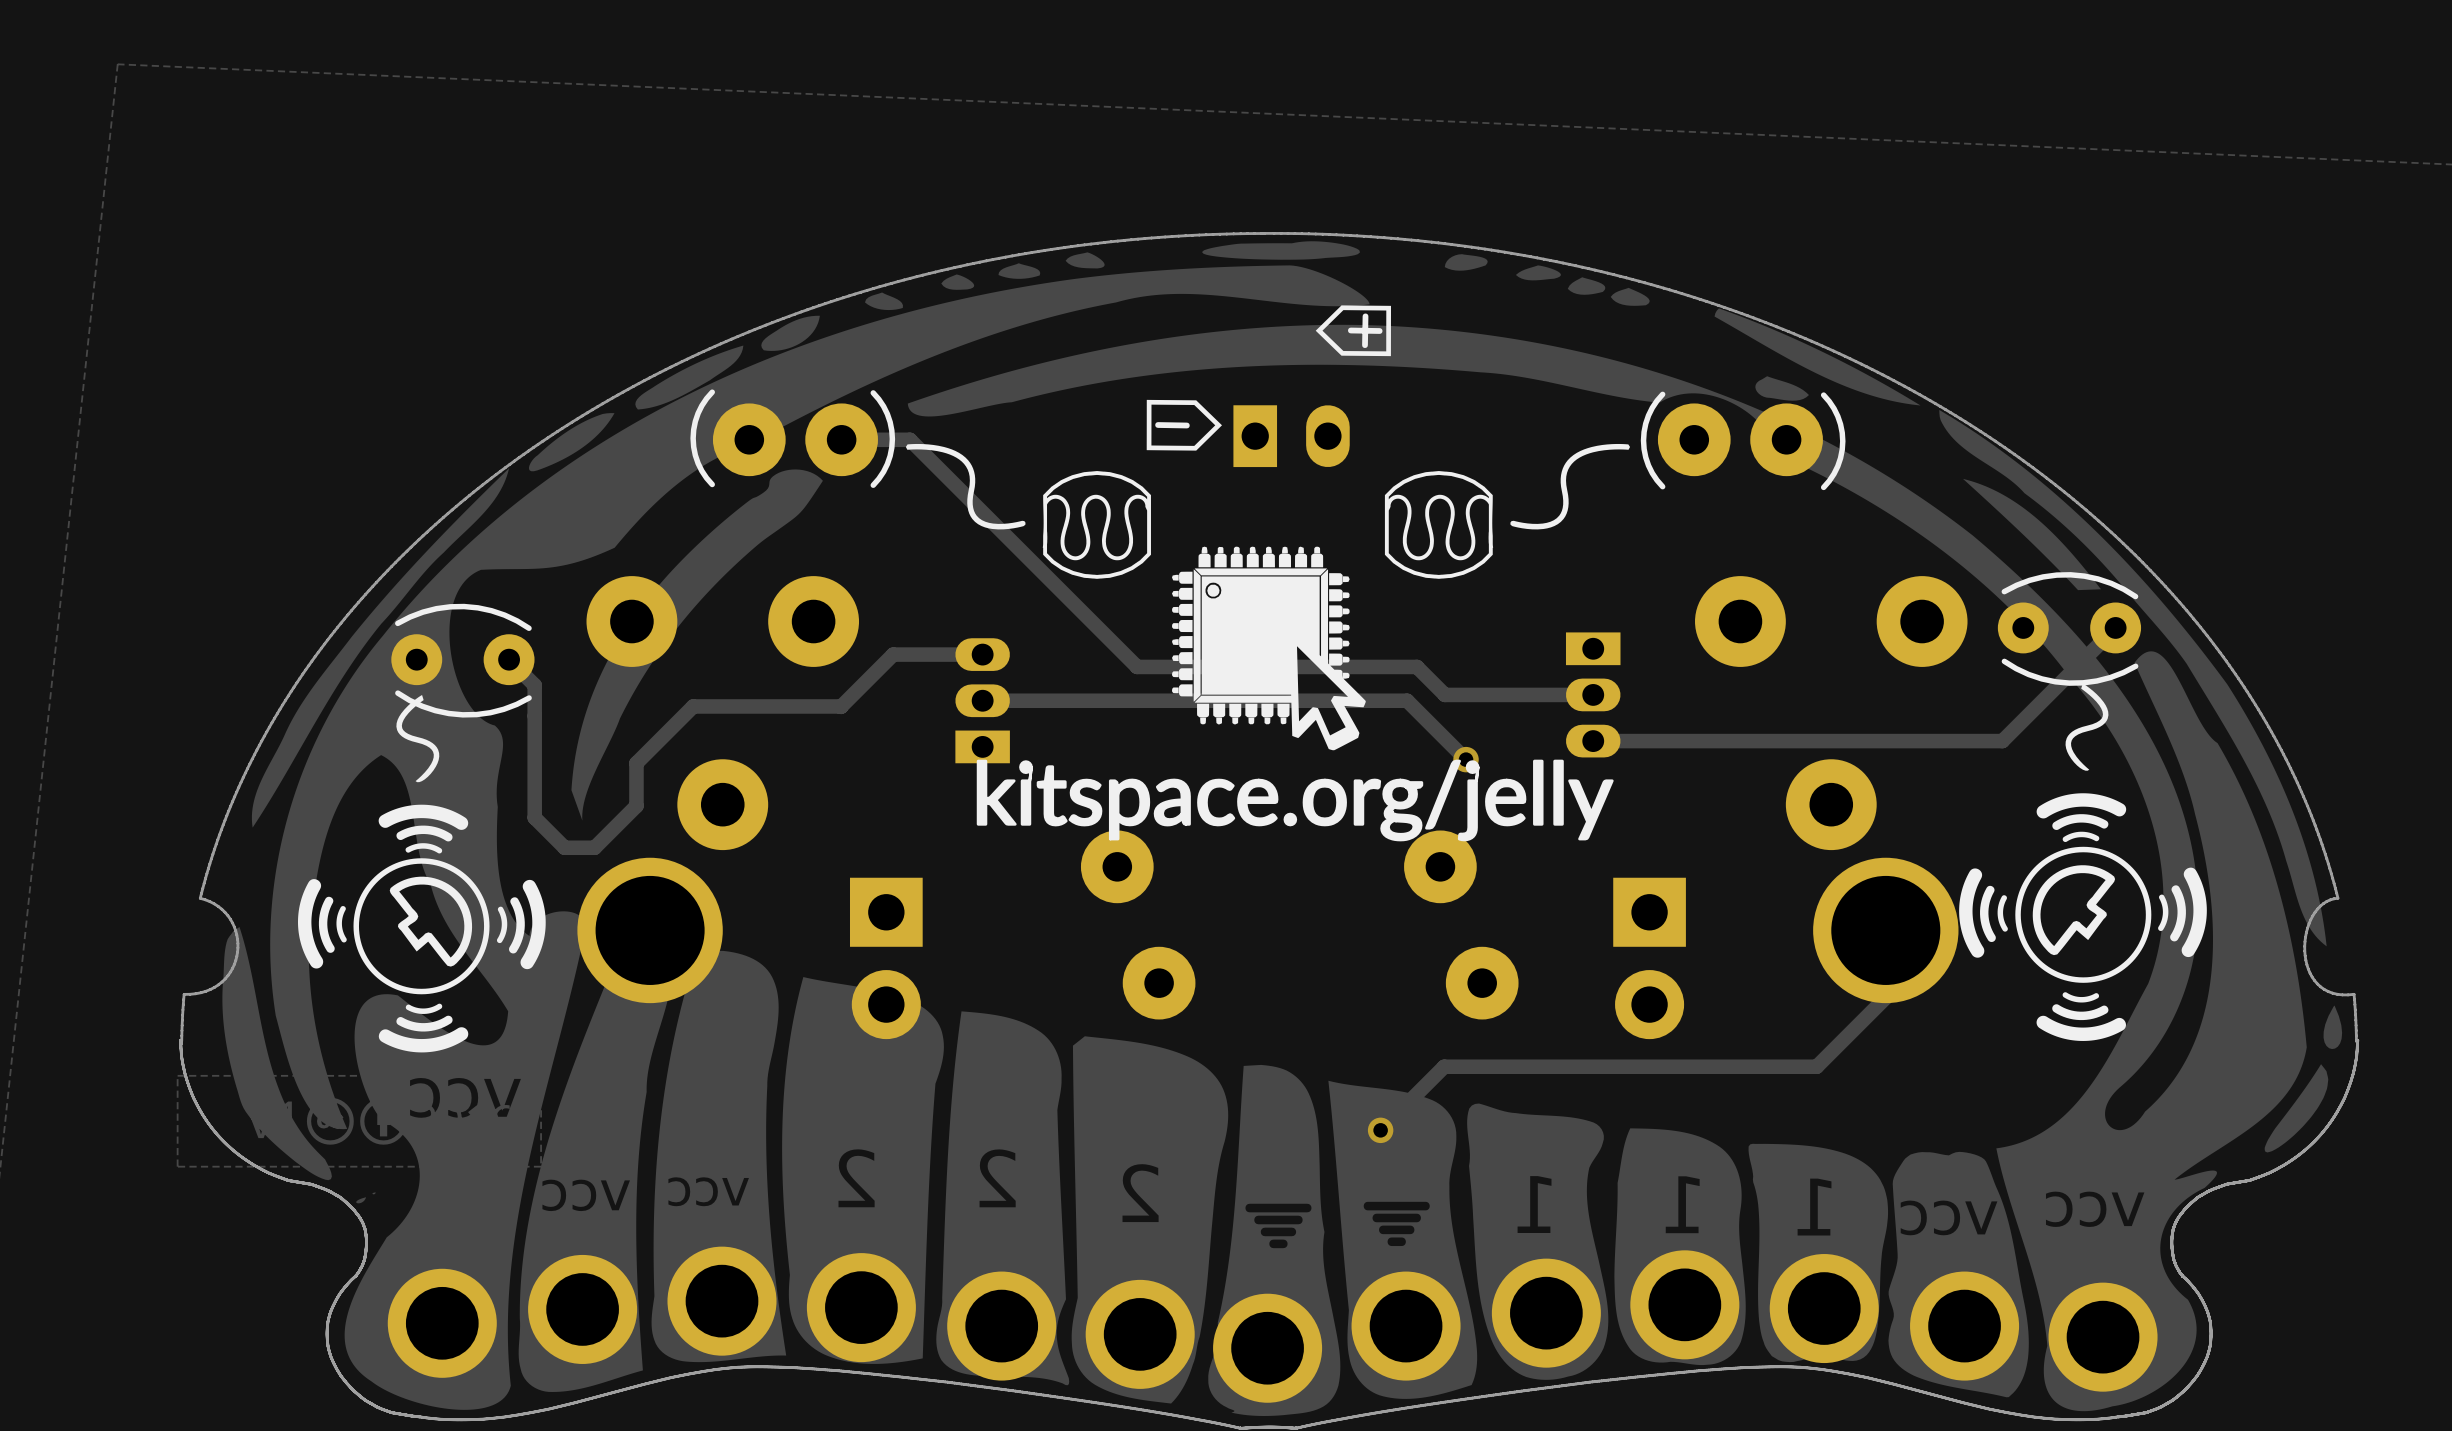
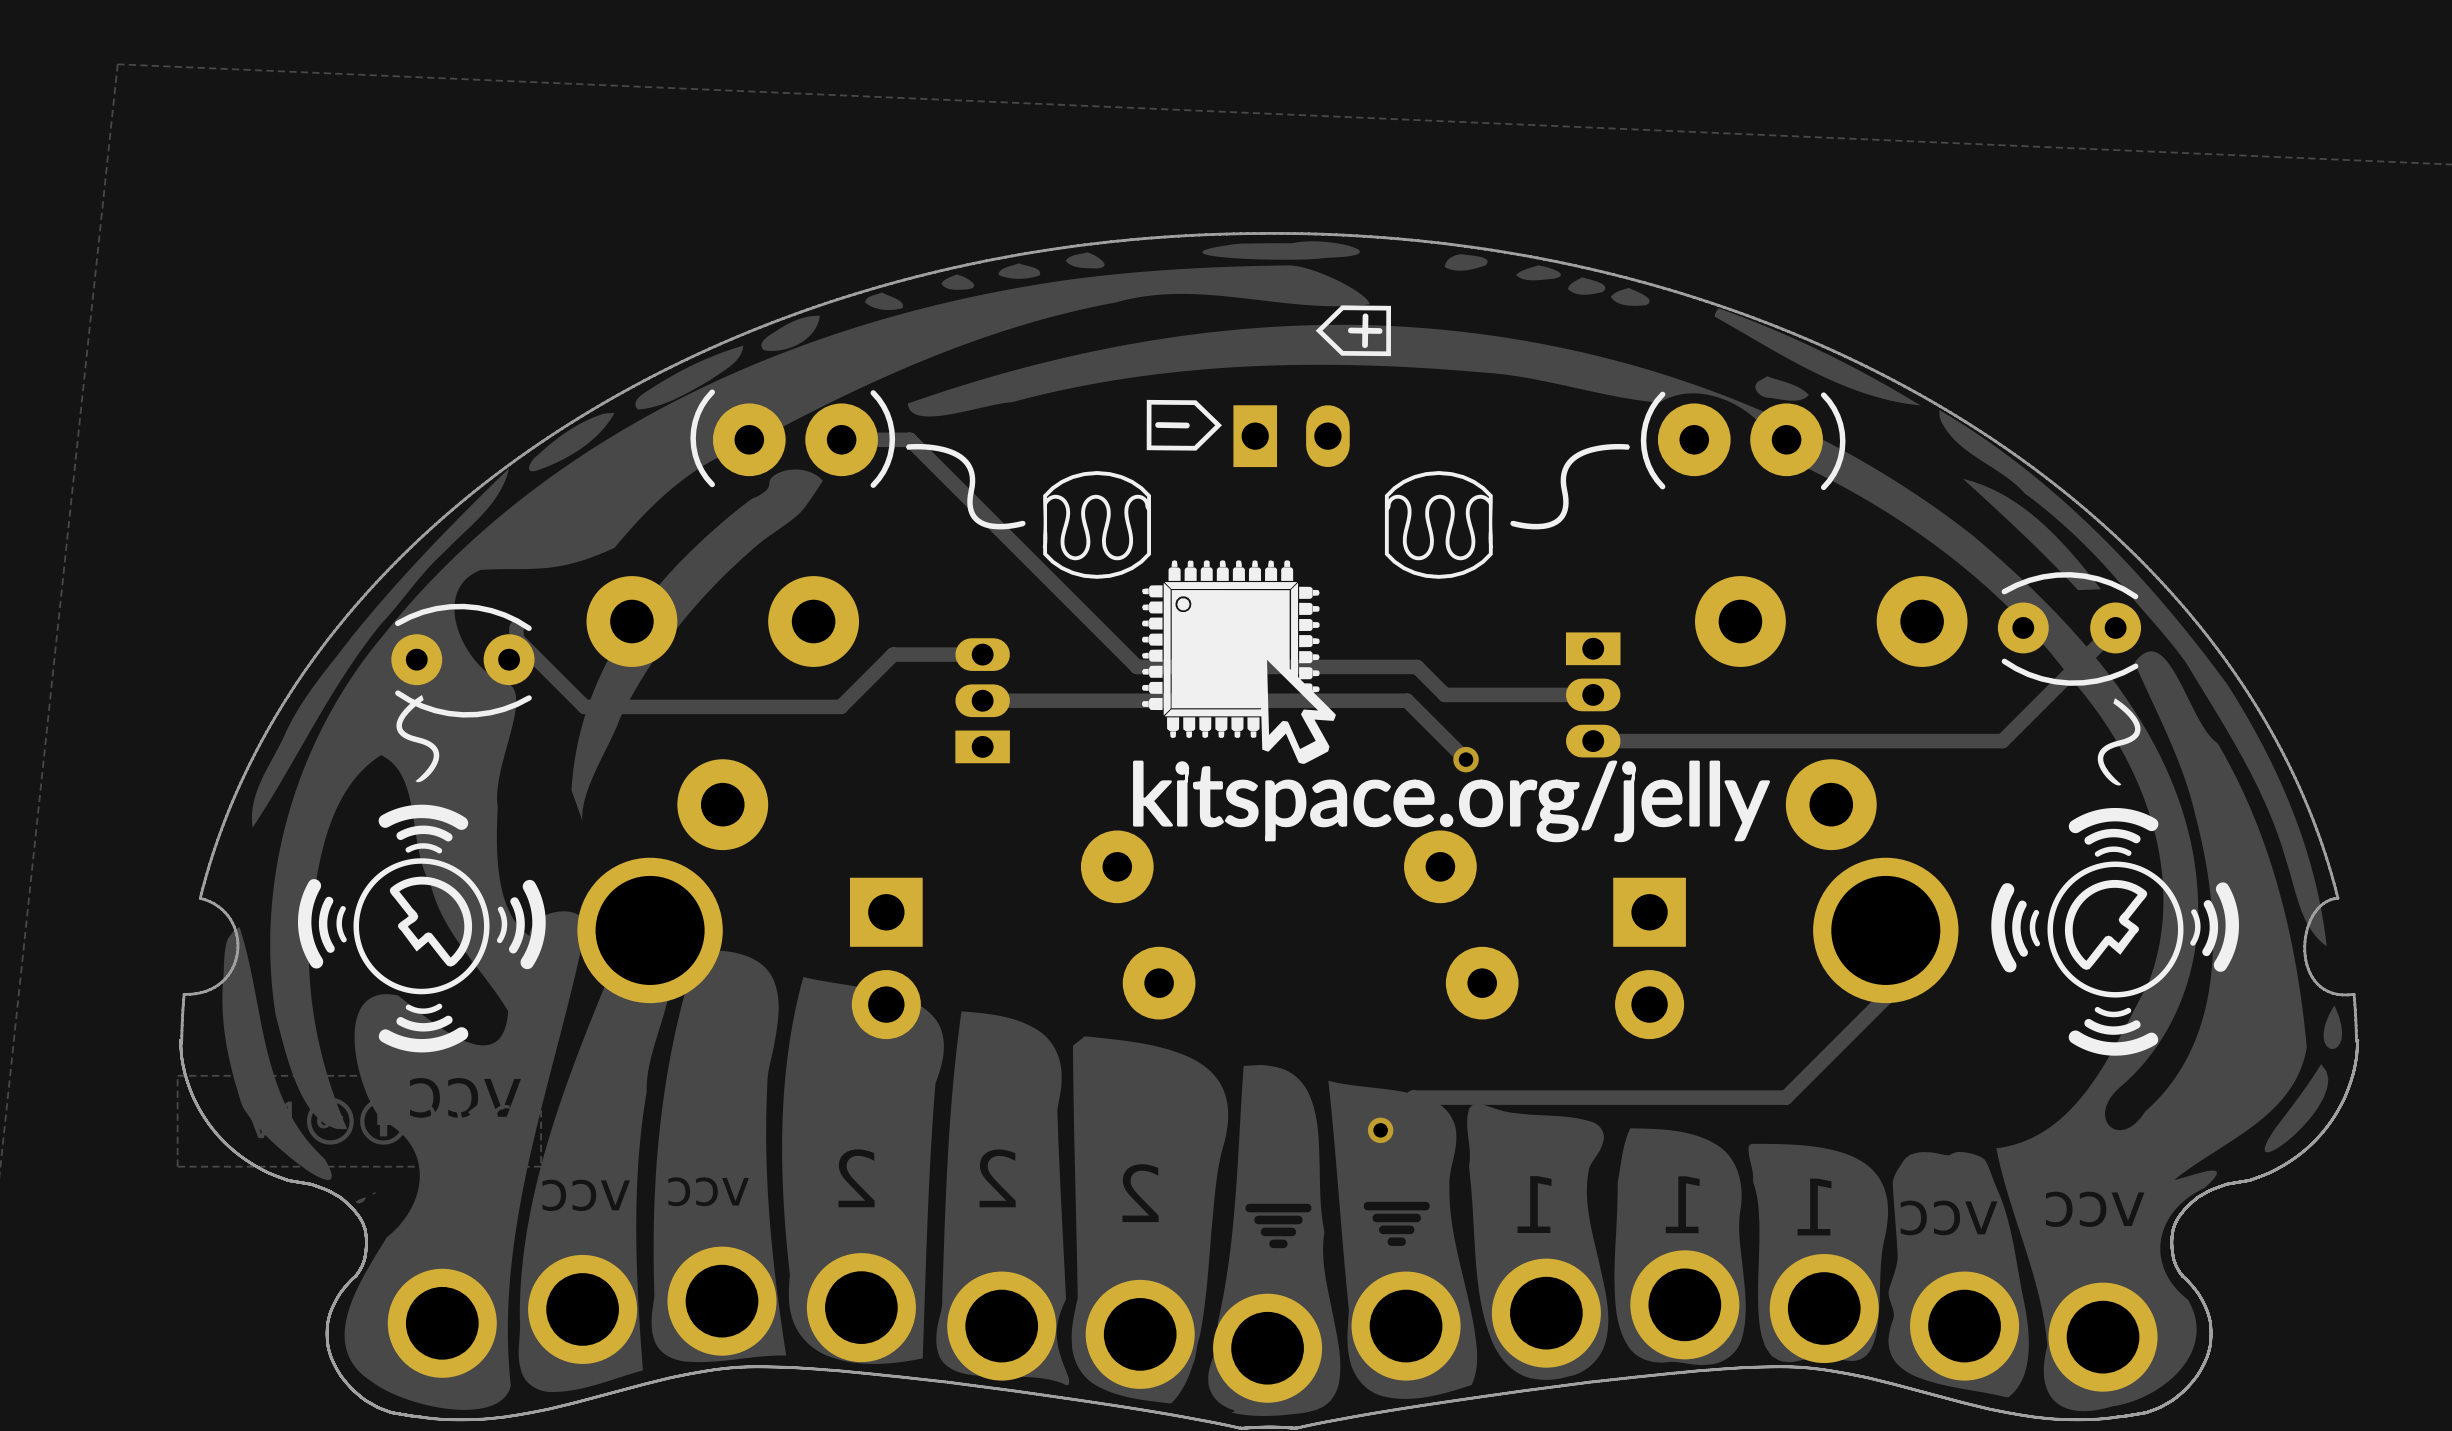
drawing shape: [222, 241, 2343, 1417] -> [222, 241, 2343, 1417]
drawing position: (1268, 648) -> (1238, 662)
track: (509, 659) (534, 685) (534, 817) (564, 847) (594, 847) (636, 805) (636, 763) (693, 706) (841, 706) -> (516, 627) (516, 638) (584, 706) (840, 706)
drawing position: (1295, 800) -> (1451, 801)
drawing position: (2082, 862) -> (2115, 877)
track: (1816, 1066) (1444, 1066) (1413, 1097) -> (1816, 1066) (1785, 1097) (1413, 1097)

